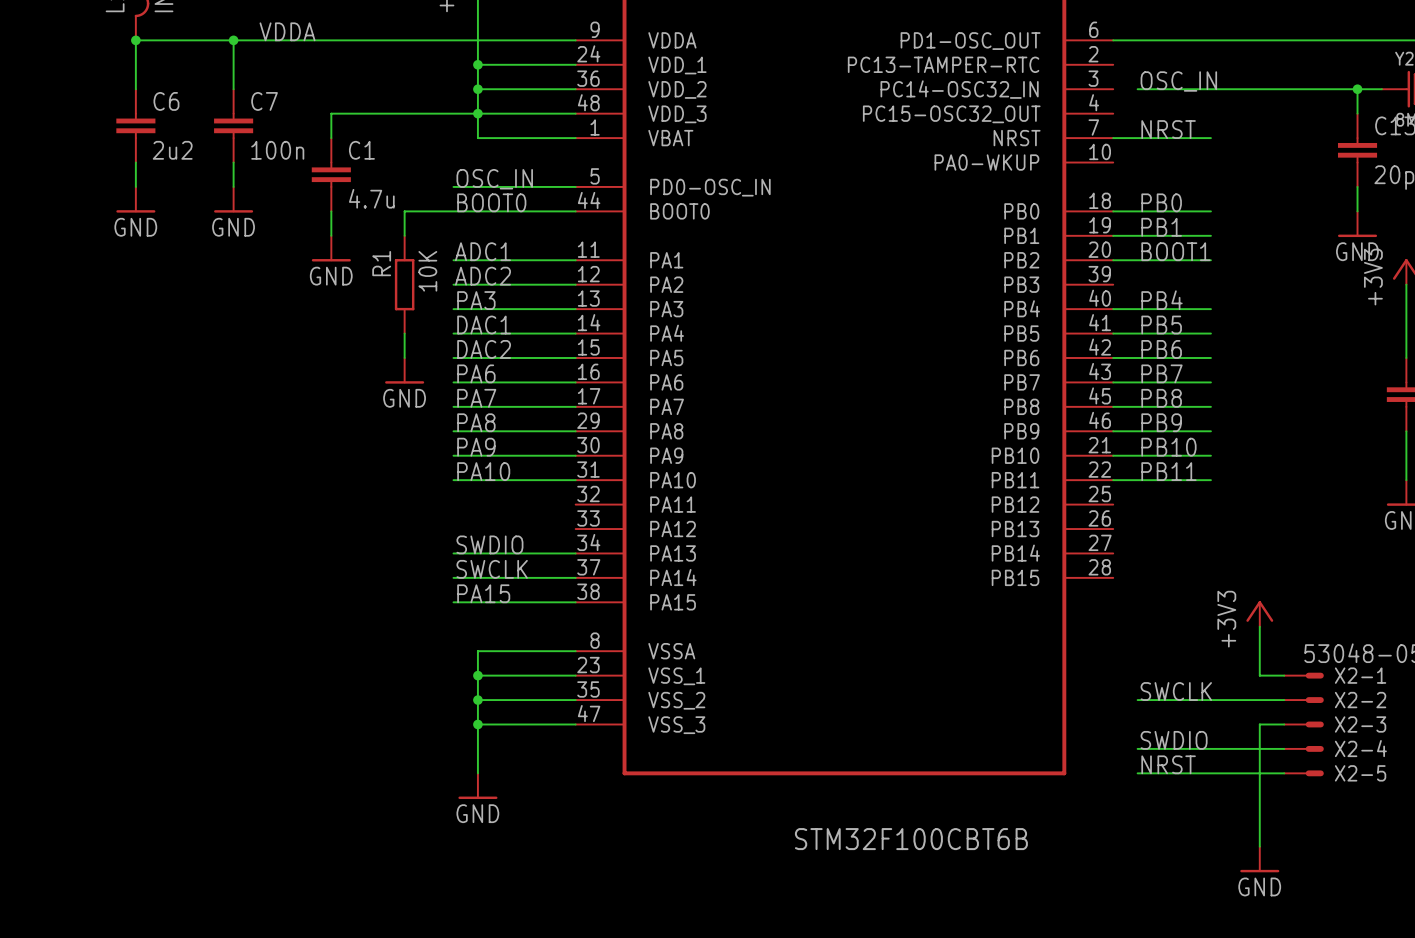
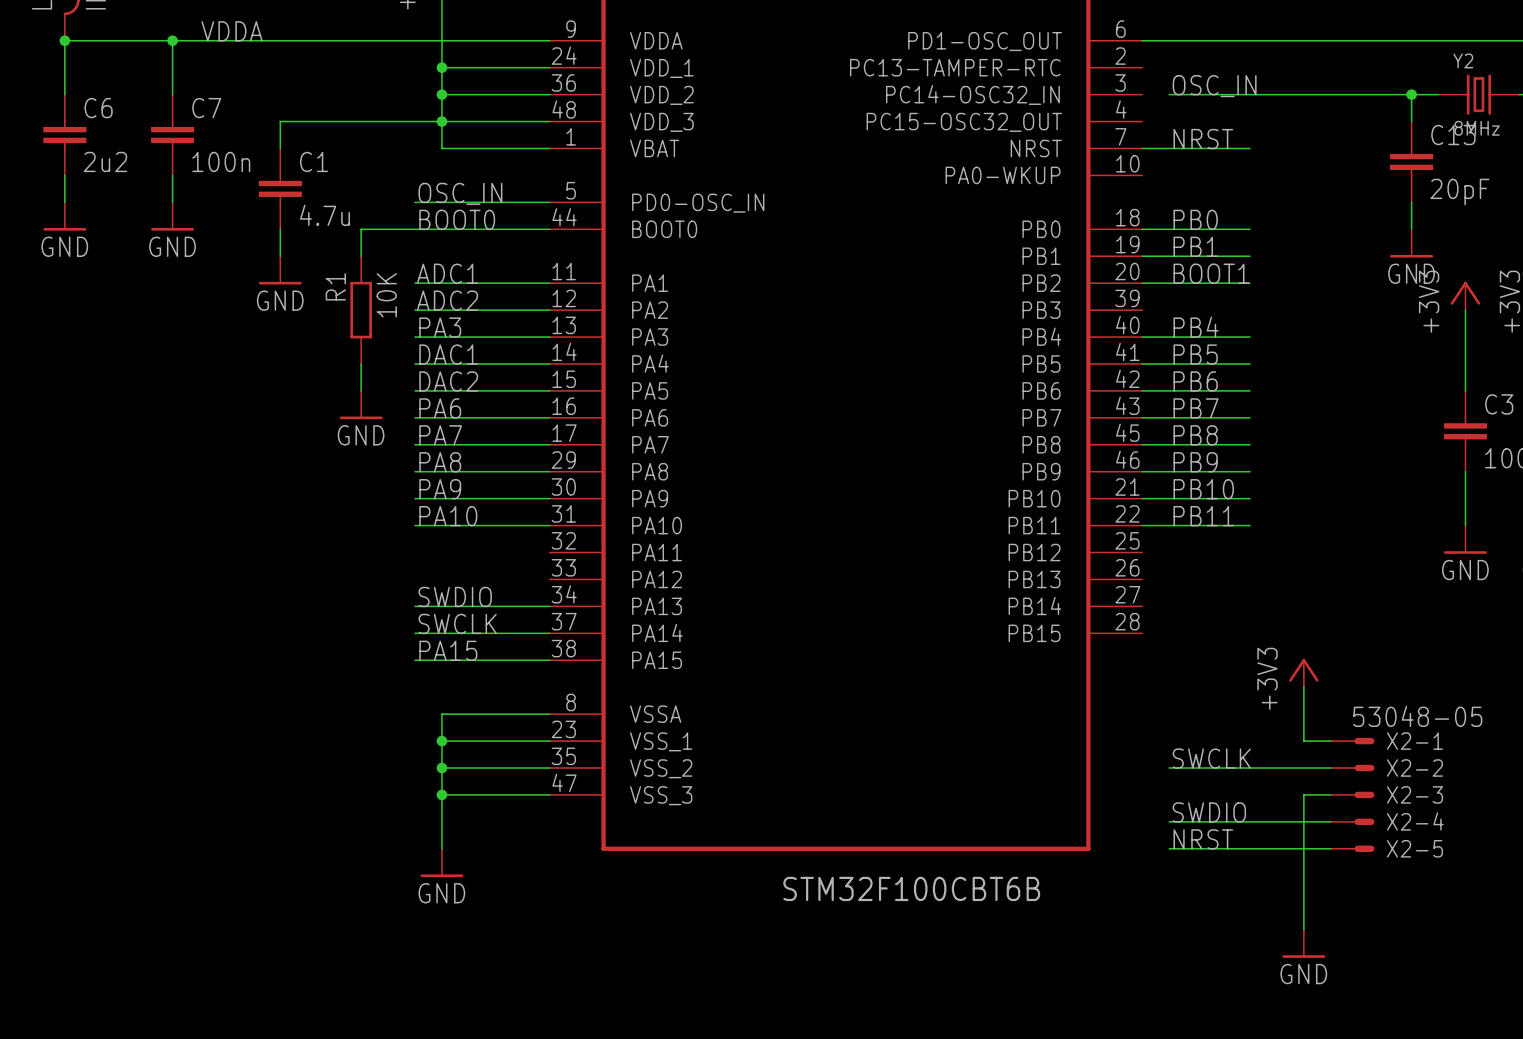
part value position: STM32F100CBT6B (911, 839) -> STM32F100CBT6B (911, 888)

